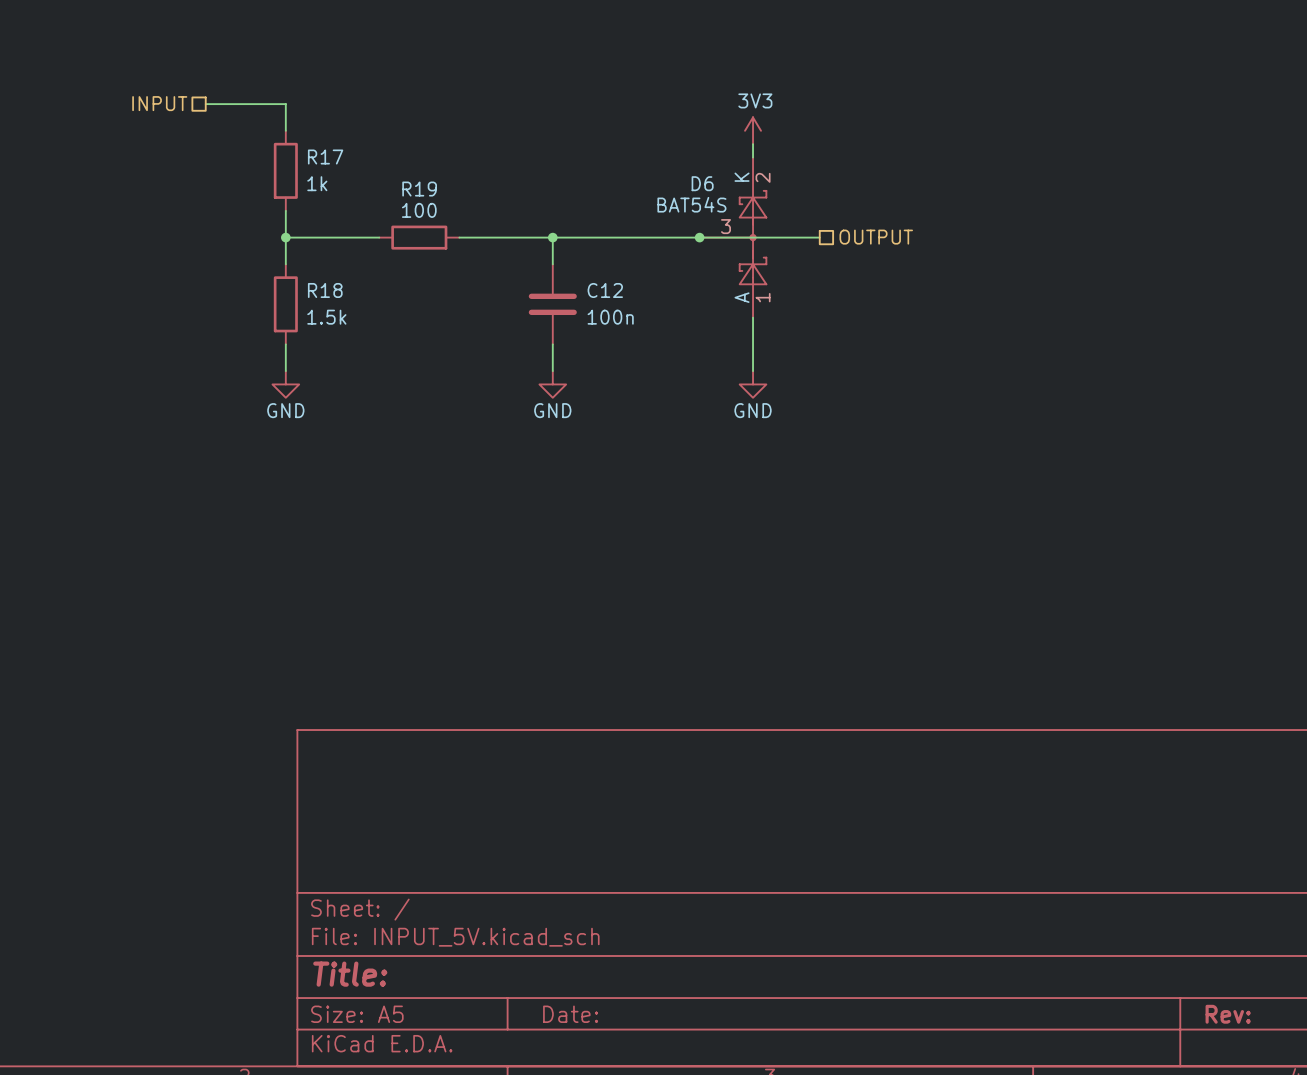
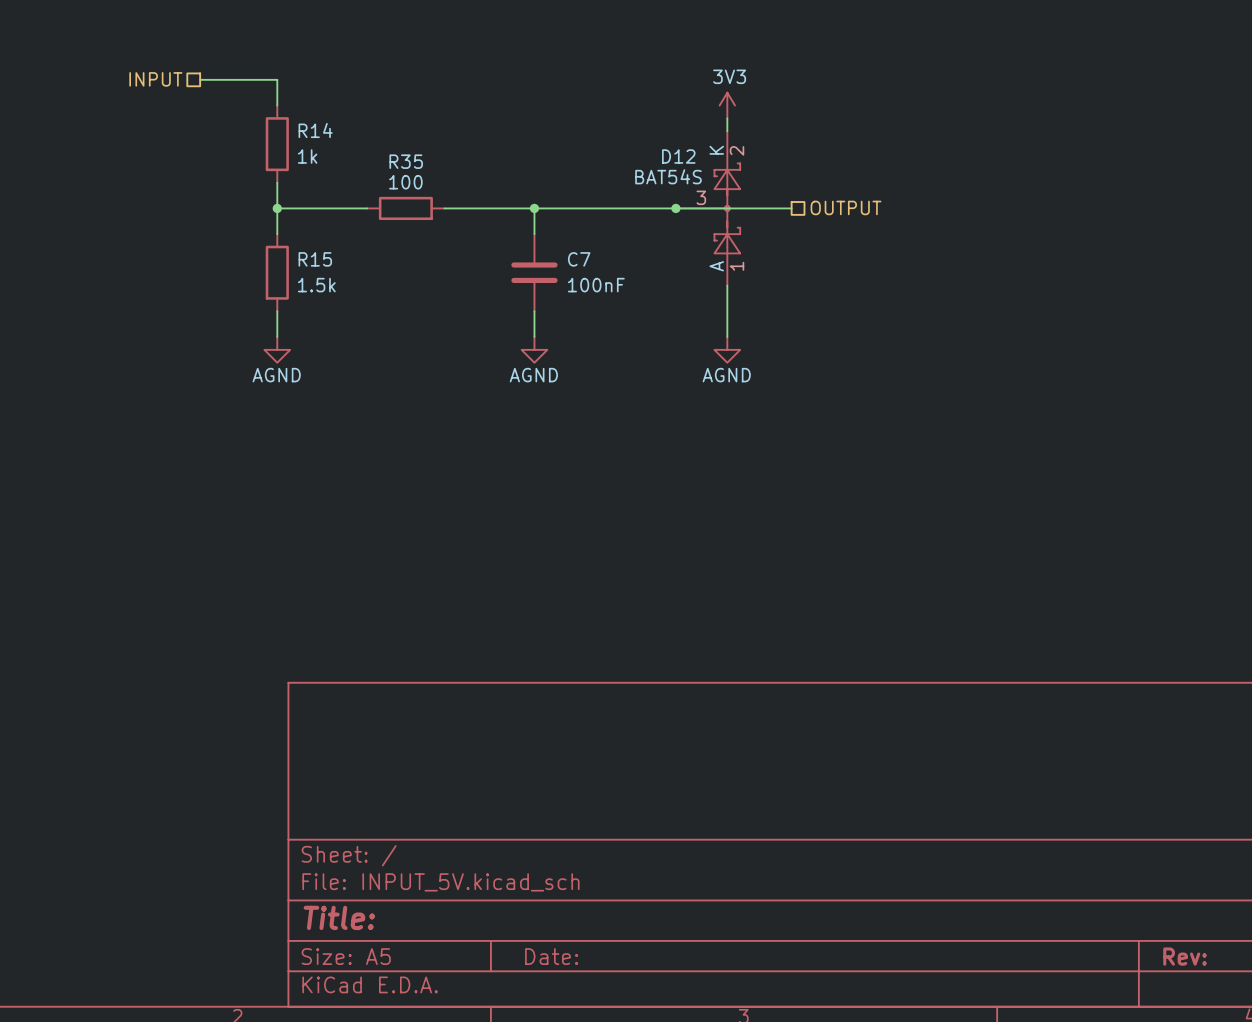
R17 name: R17 (325, 157) -> R14 (315, 130)
D6 name: D6 (702, 183) -> D12 (678, 156)
R19 name: R19 (419, 189) -> R35 (406, 161)
R18 name: R18 (325, 290) -> R15 (315, 259)
C12 name: C12 (605, 290) -> C7 (579, 259)
C12 value: 100n (610, 317) -> 100nF (596, 285)
power symbol: GND (285, 384) -> AGND (277, 349)
power symbol: GND (552, 384) -> AGND (534, 349)
power symbol: GND (753, 384) -> AGND (727, 349)

